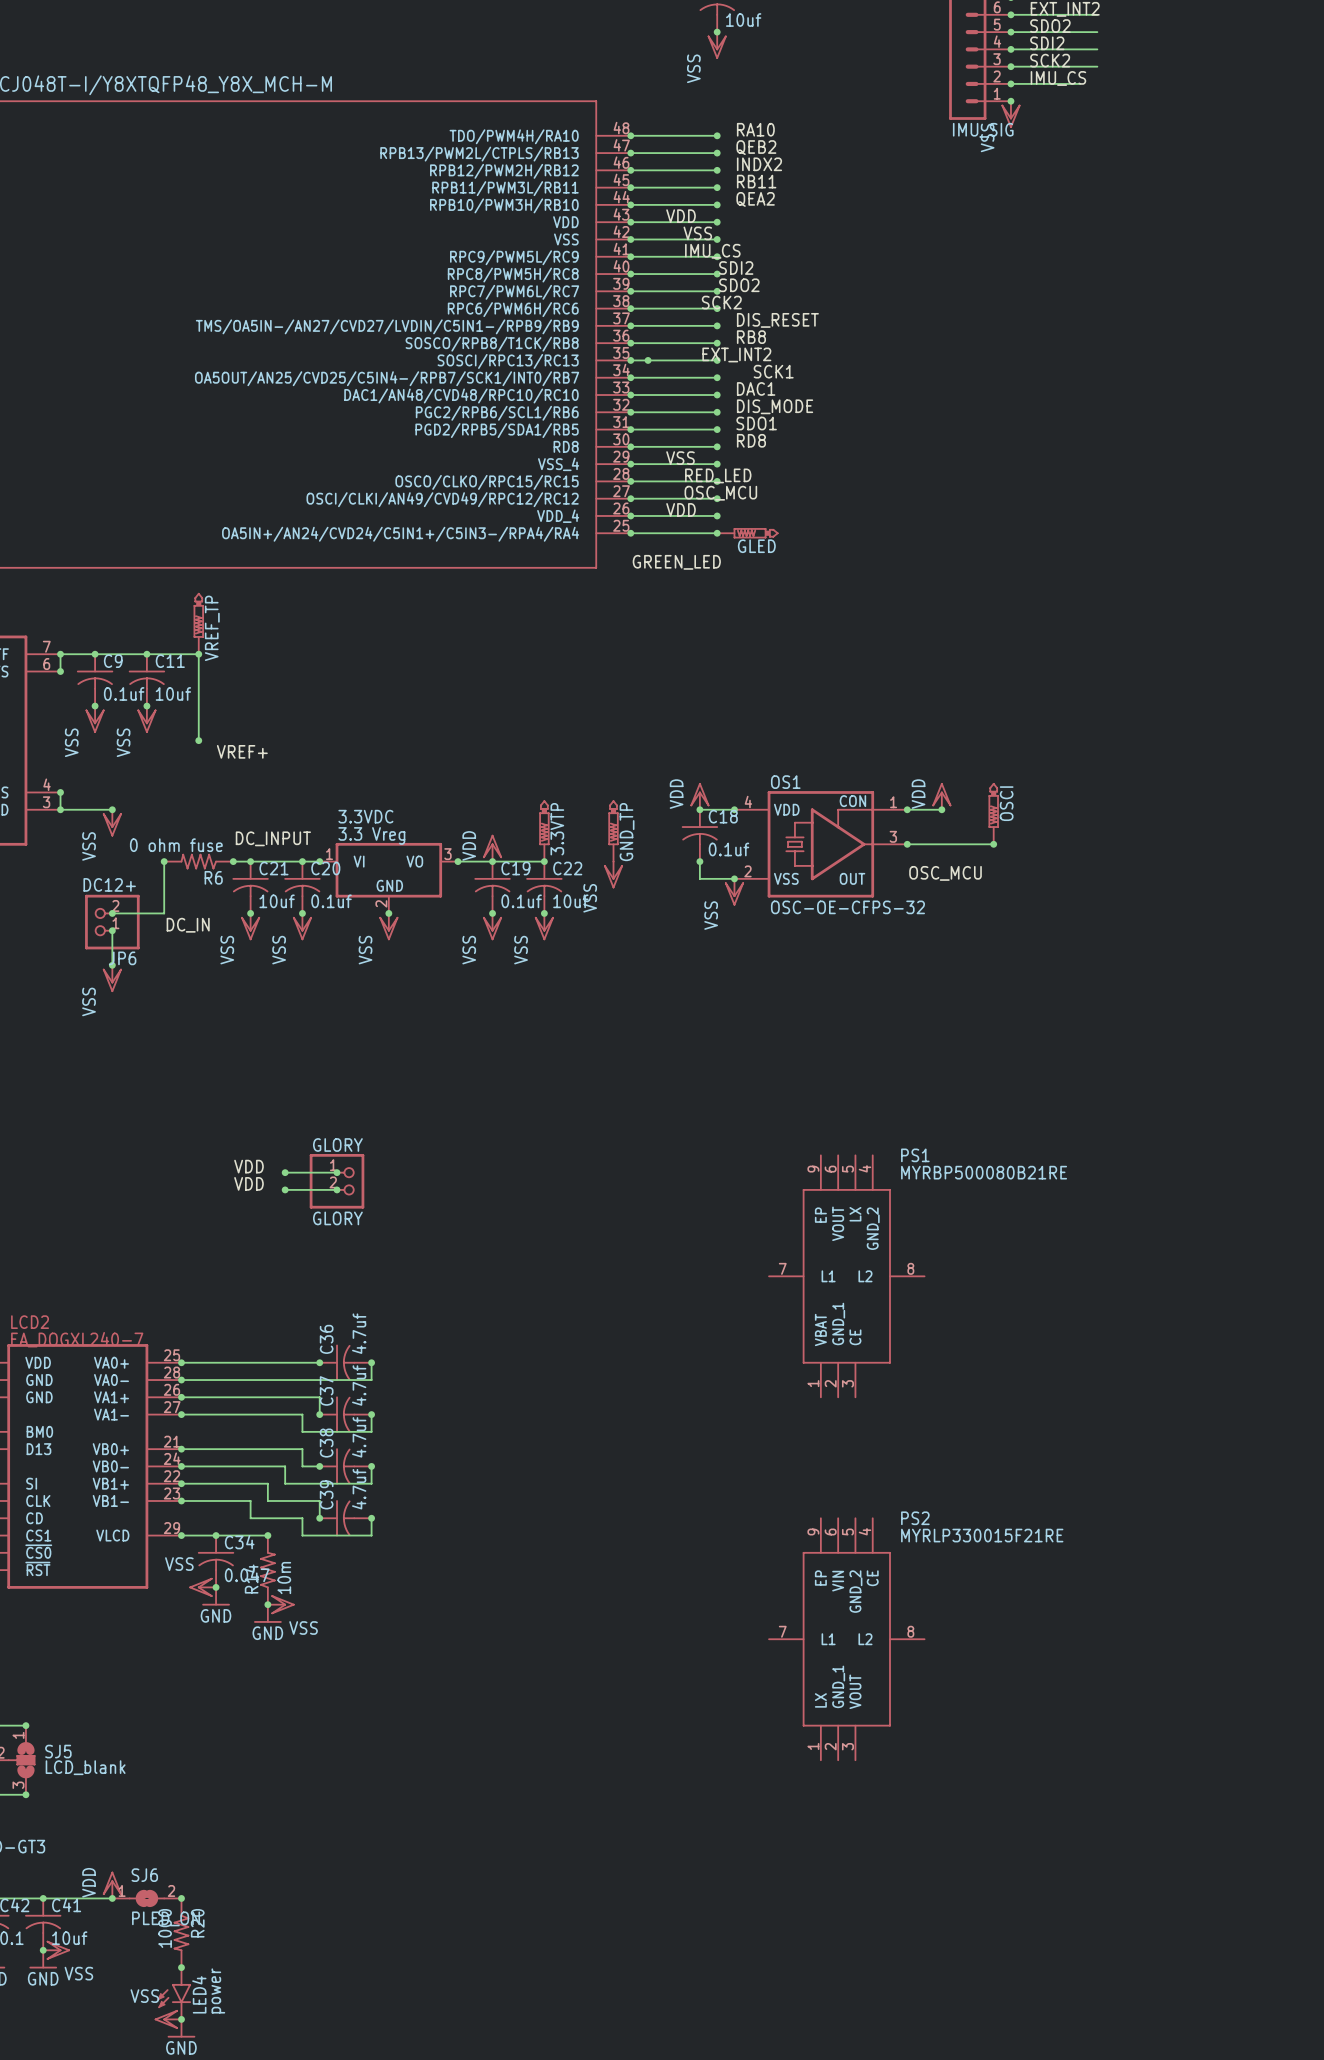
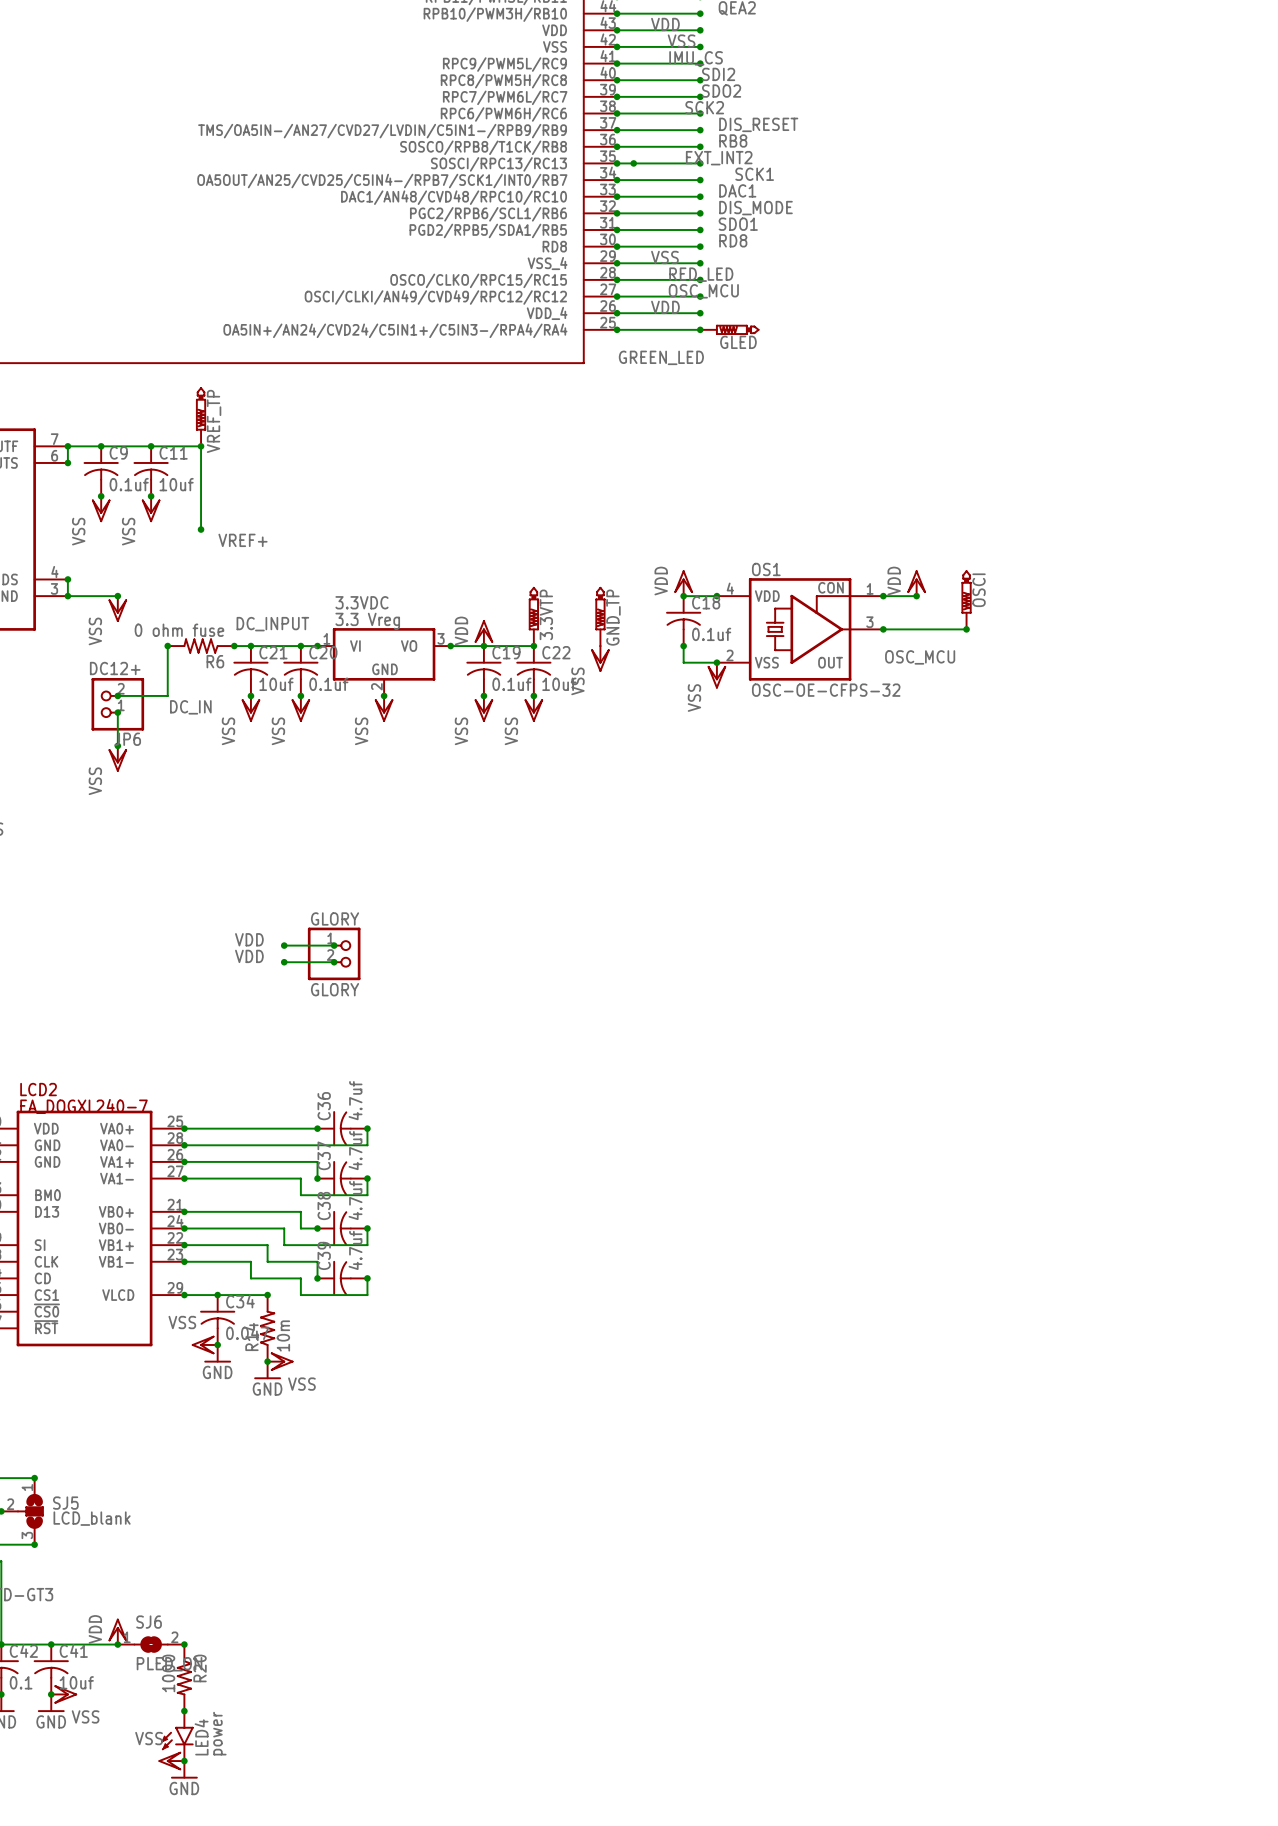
PS1: MYRBP500080B21RE (846, 1276) -> none
PS2: MYRLP330015F21RE (846, 1639) -> none

